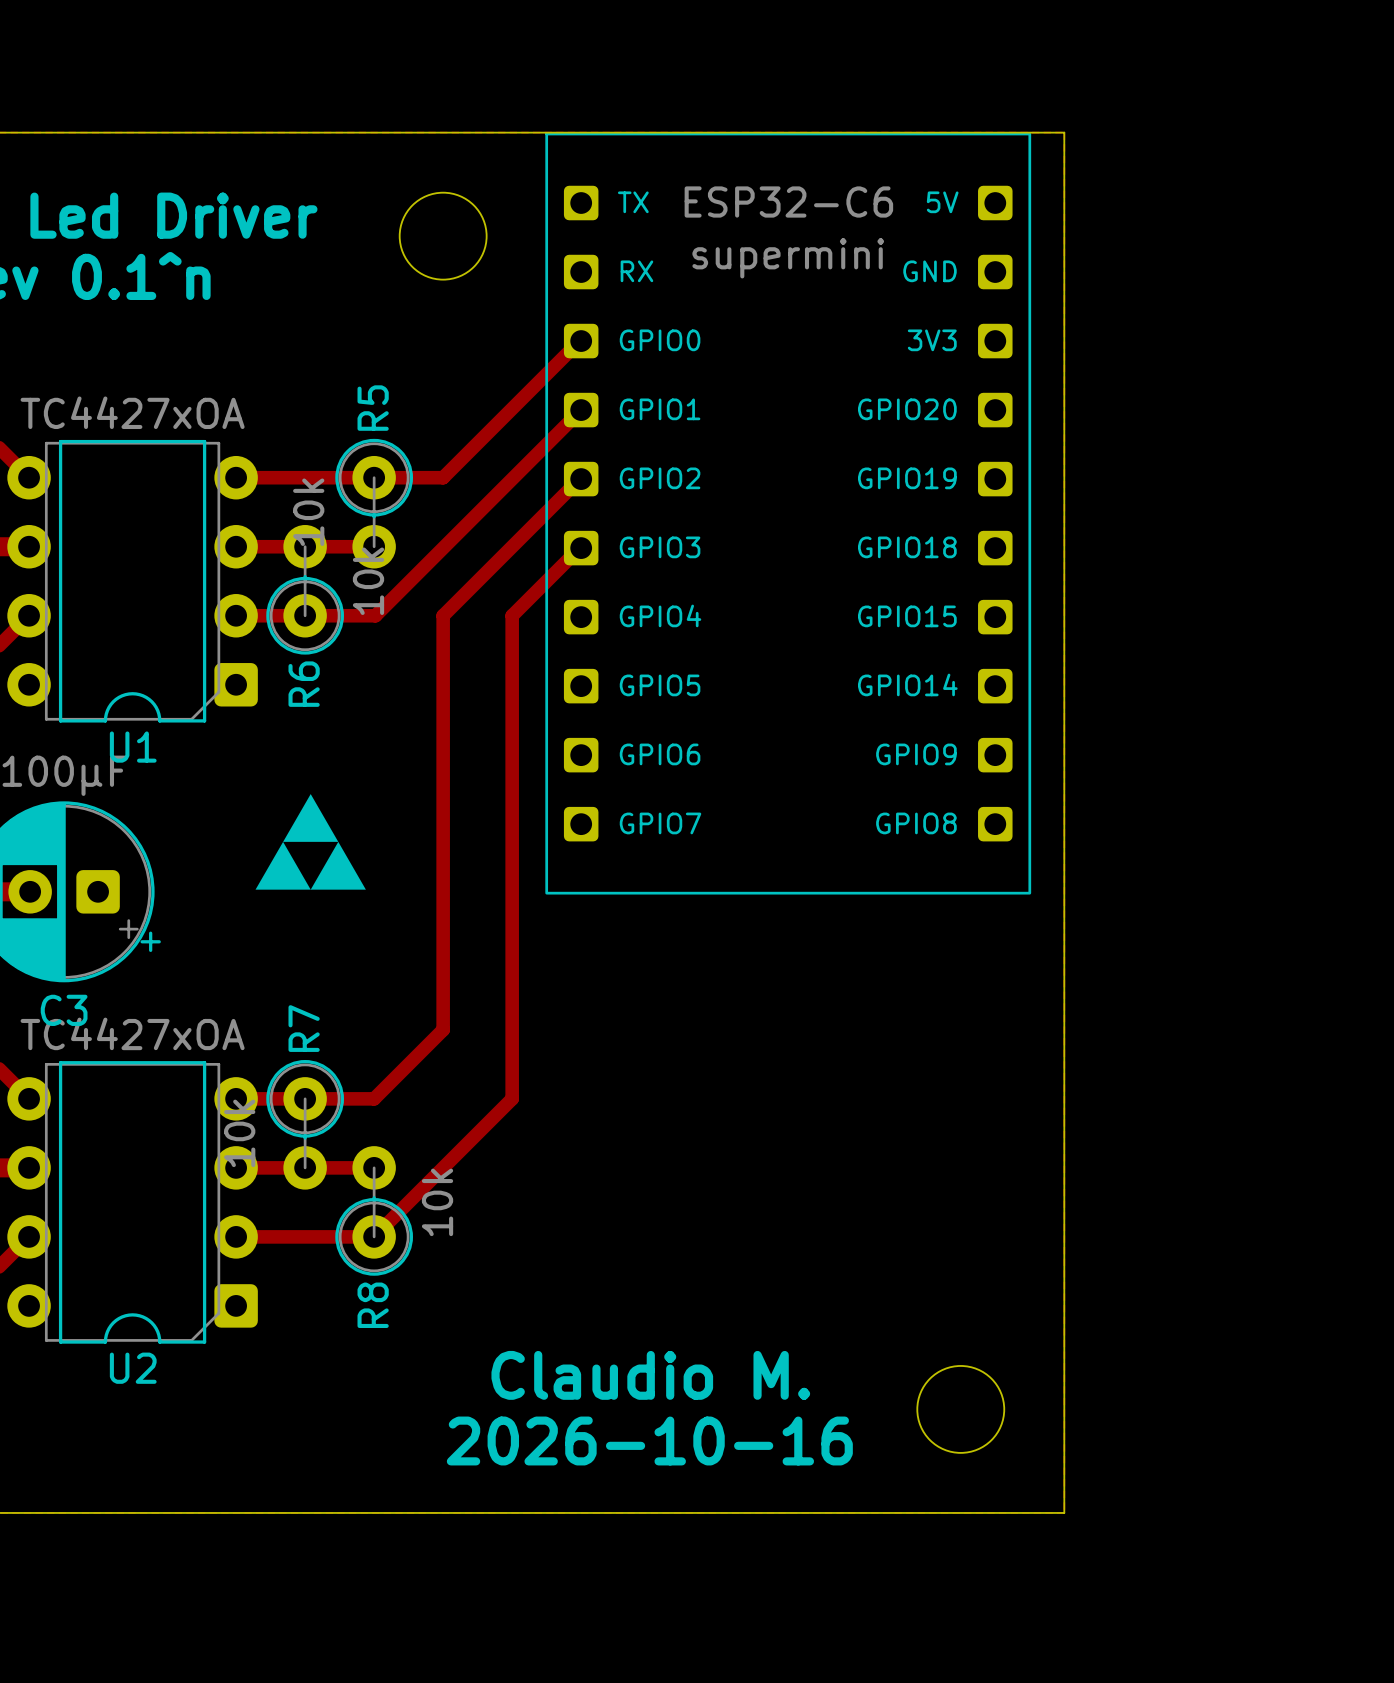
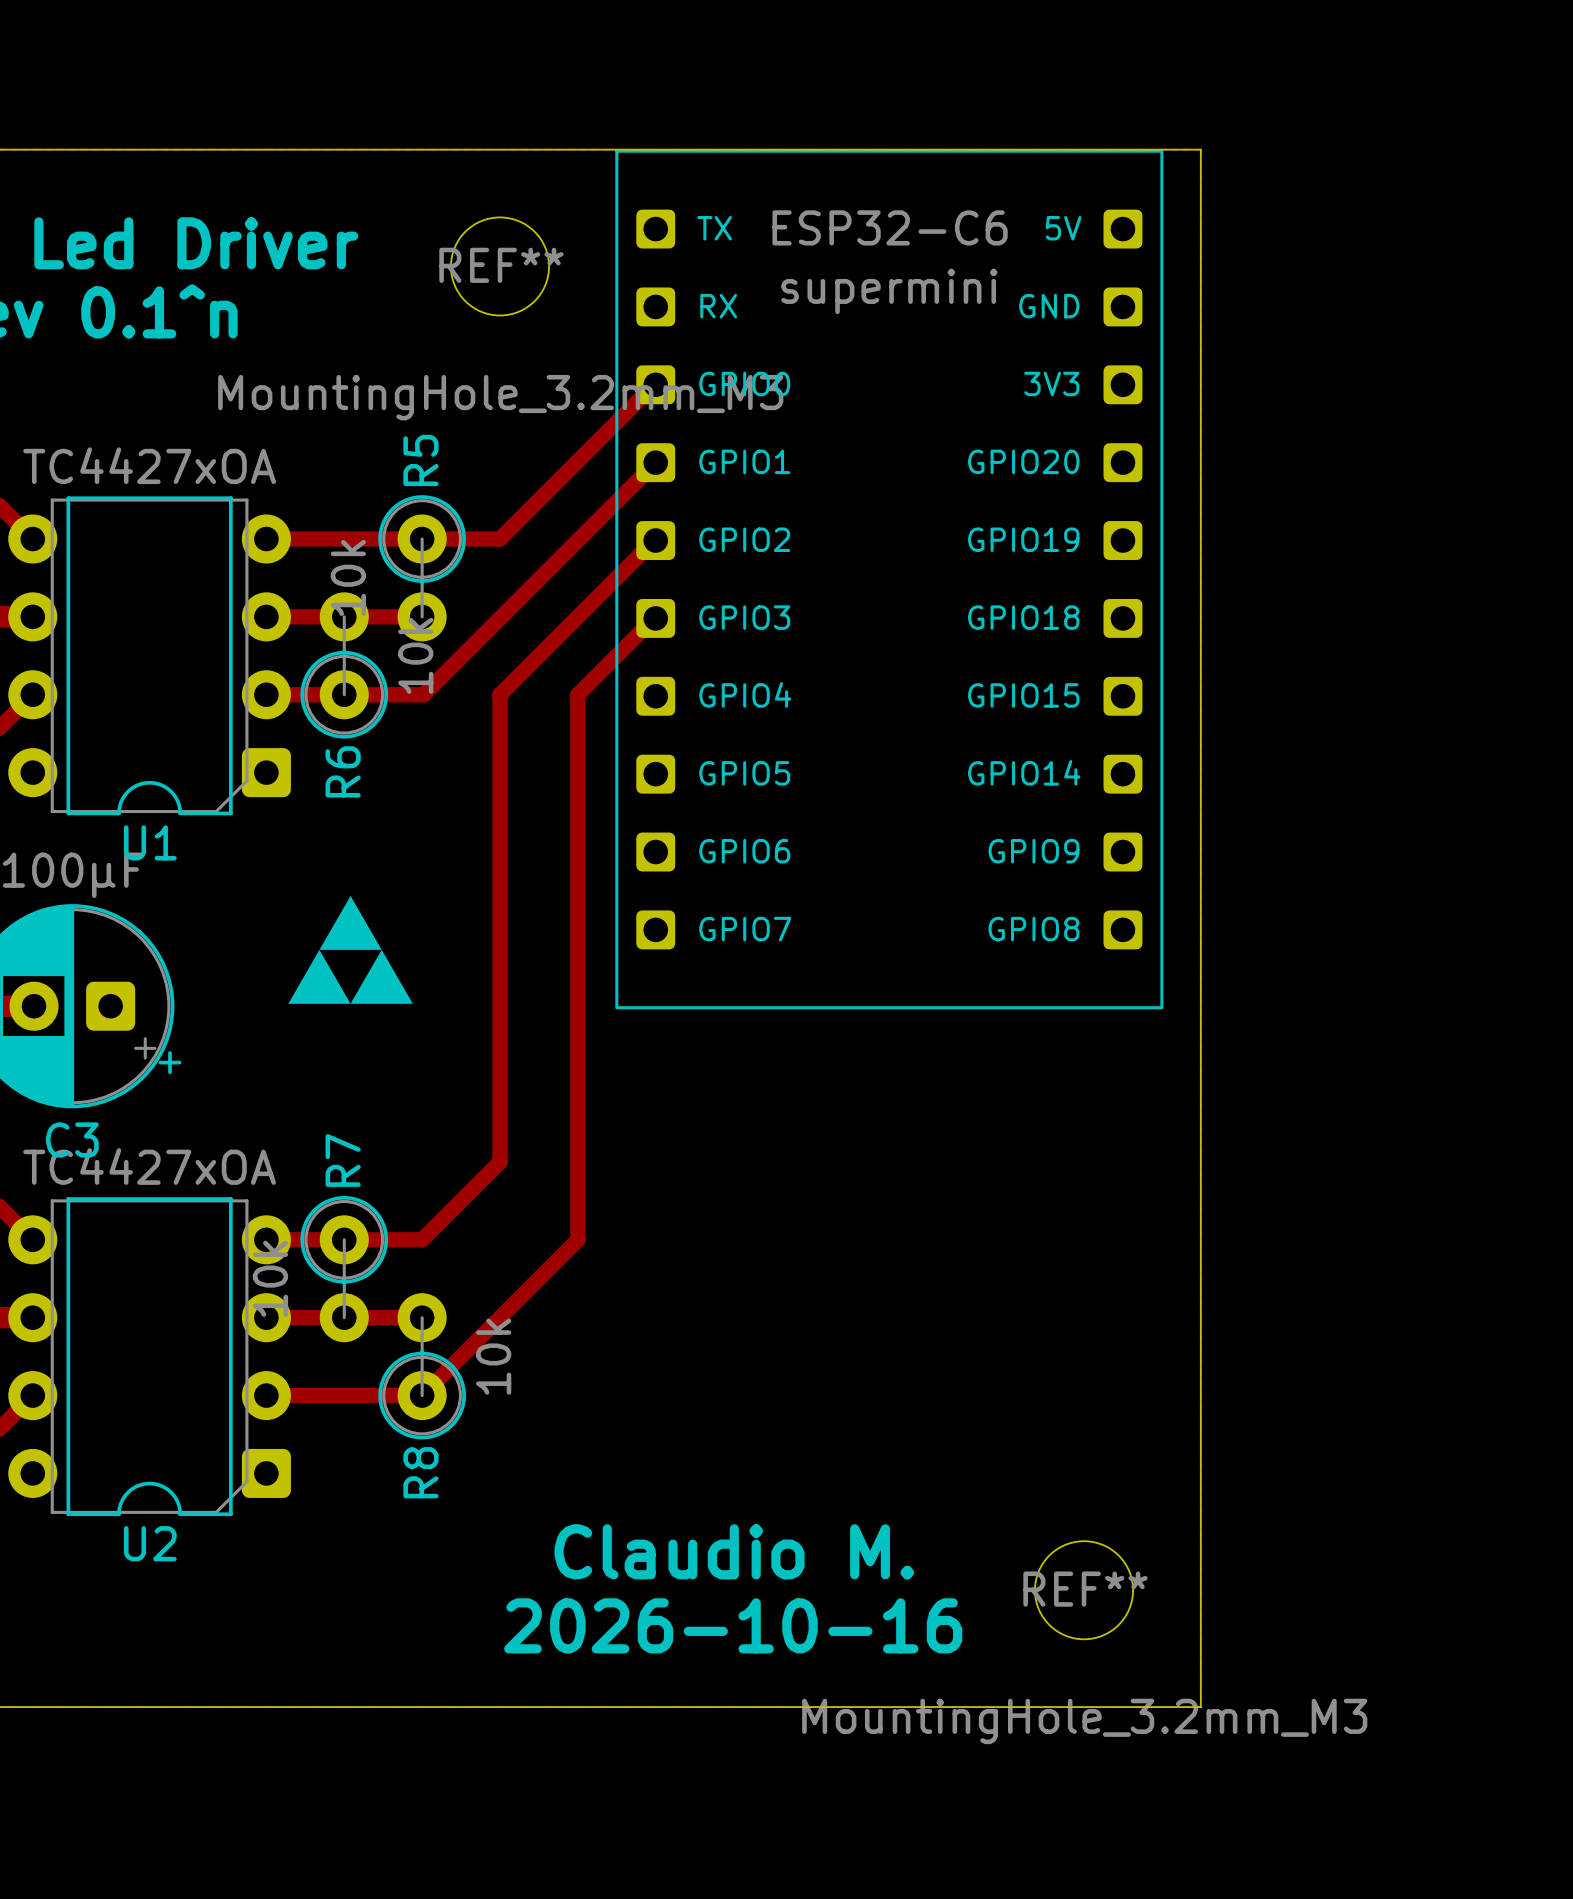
REF** name: none -> REF** (501, 265)
REF** value: none -> MountingHole_3.2mm_M3 (500, 397)
REF** name: none -> REF** (1085, 1589)
REF** value: none -> MountingHole_3.2mm_M3 (1084, 1721)

